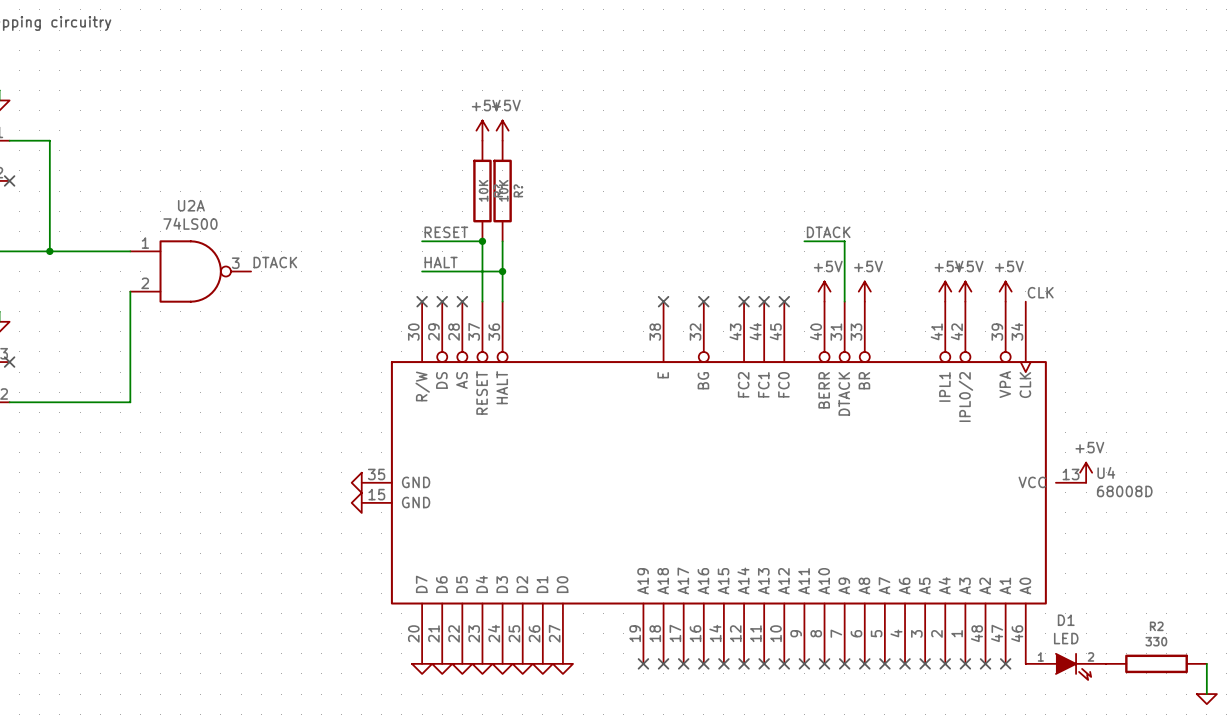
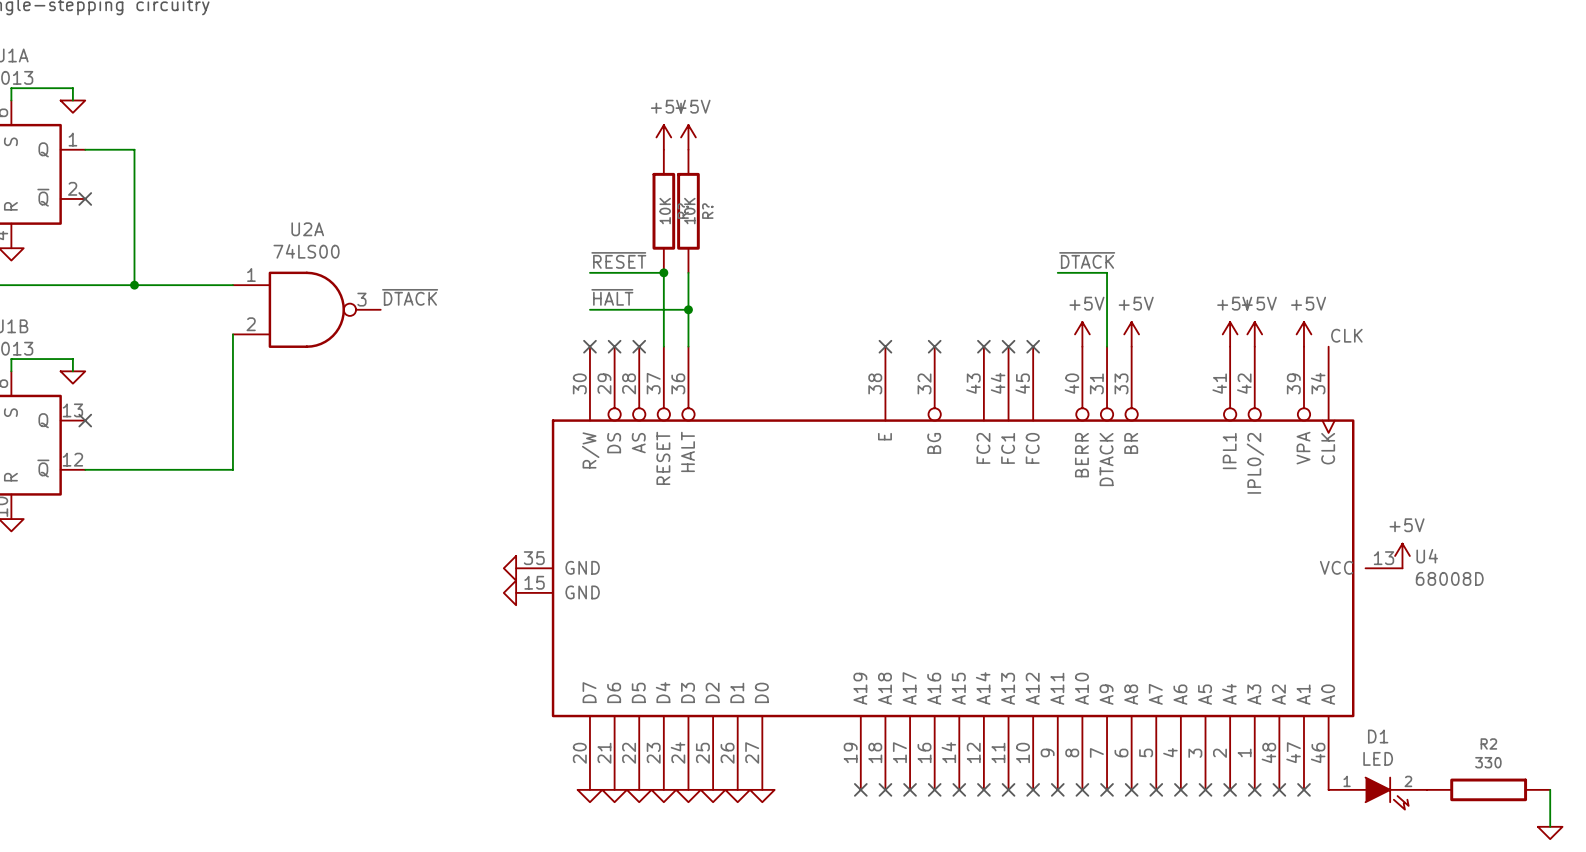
label: RESET (446, 232) -> ~{RESET} (618, 260)
label: DTACK (828, 232) -> ~{DTACK} (1087, 260)
label: DTACK (275, 262) -> ~{DTACK} (410, 297)
label: HALT (441, 262) -> ~{HALT} (612, 297)

